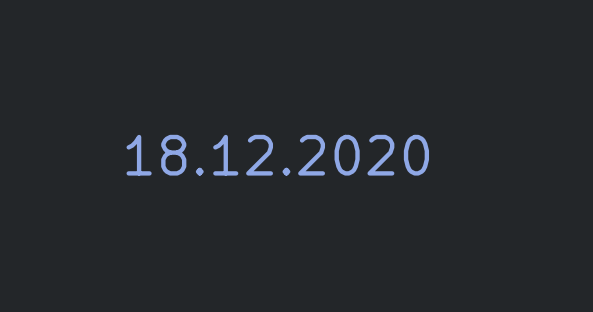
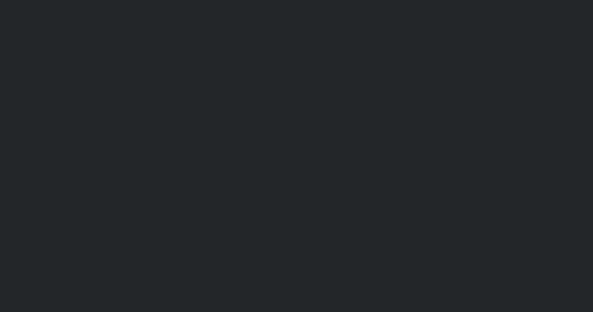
text: 18.12.2020 (277, 155) -> none

